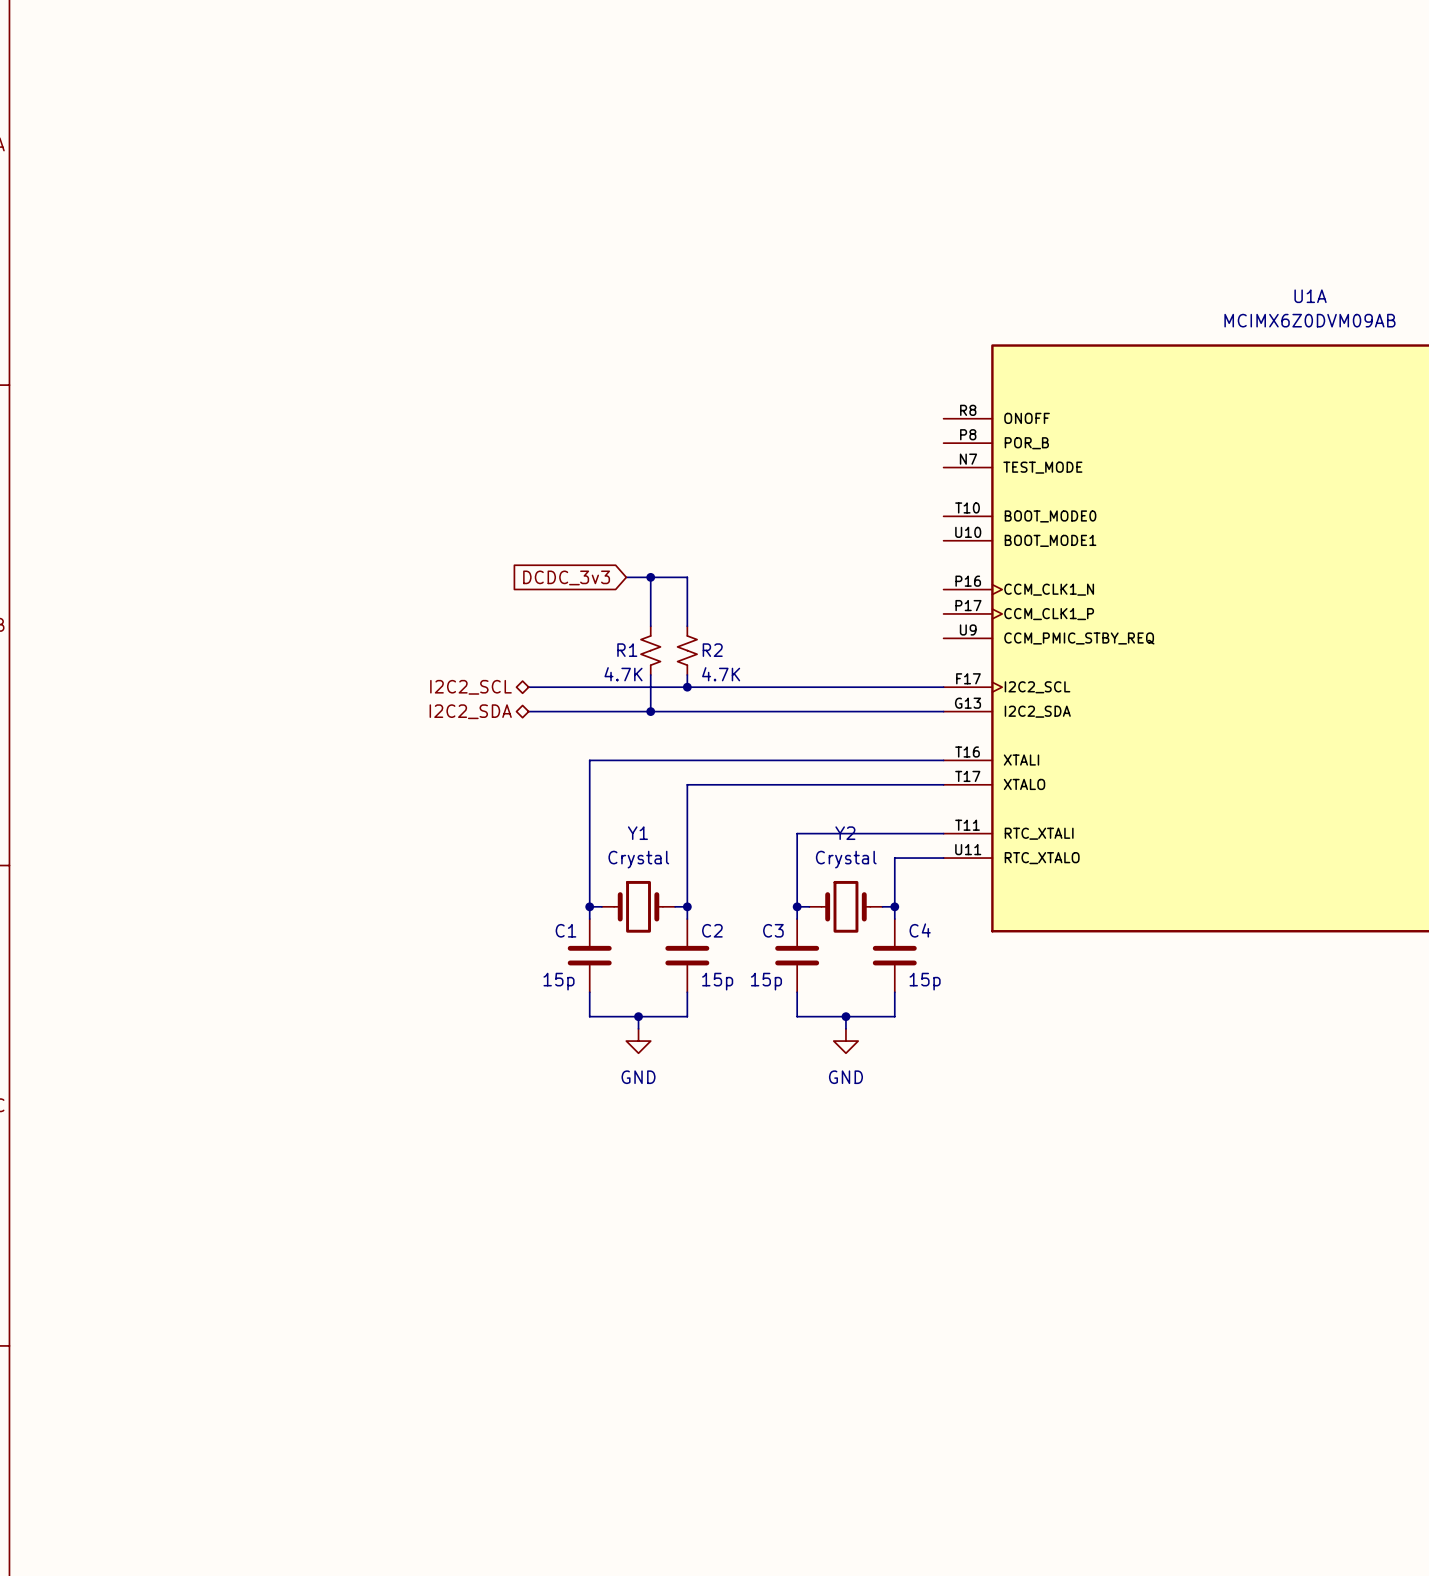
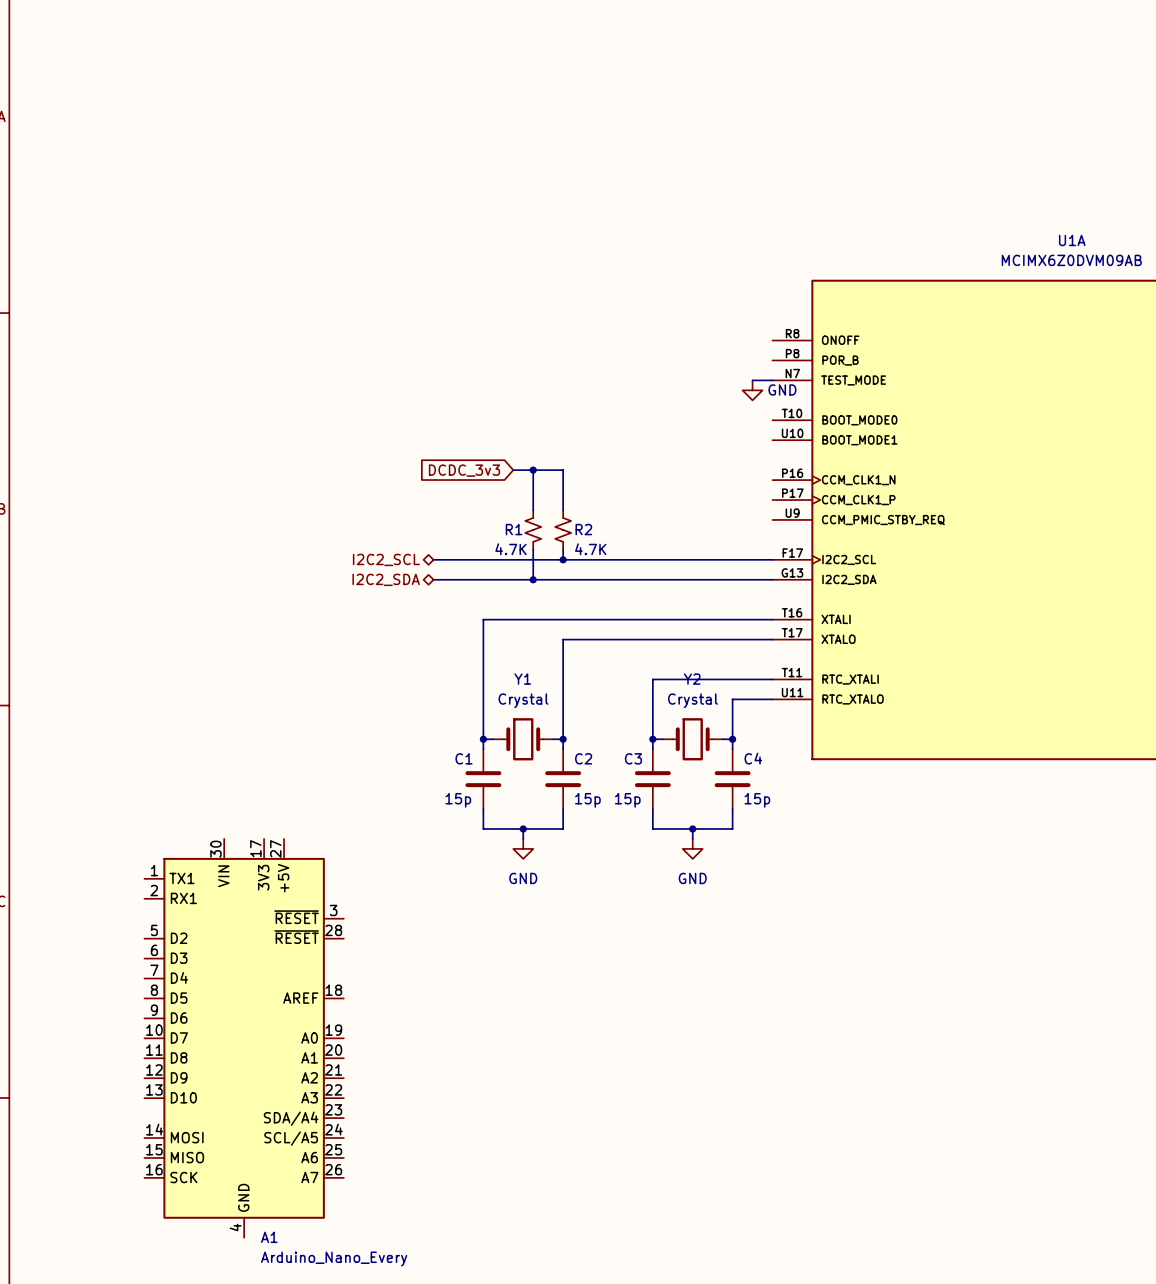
wire: none -> (752, 380) (772, 380)
power symbol: none -> GND (752, 390)
A1: none -> Arduino_Nano_Every (244, 1038)

